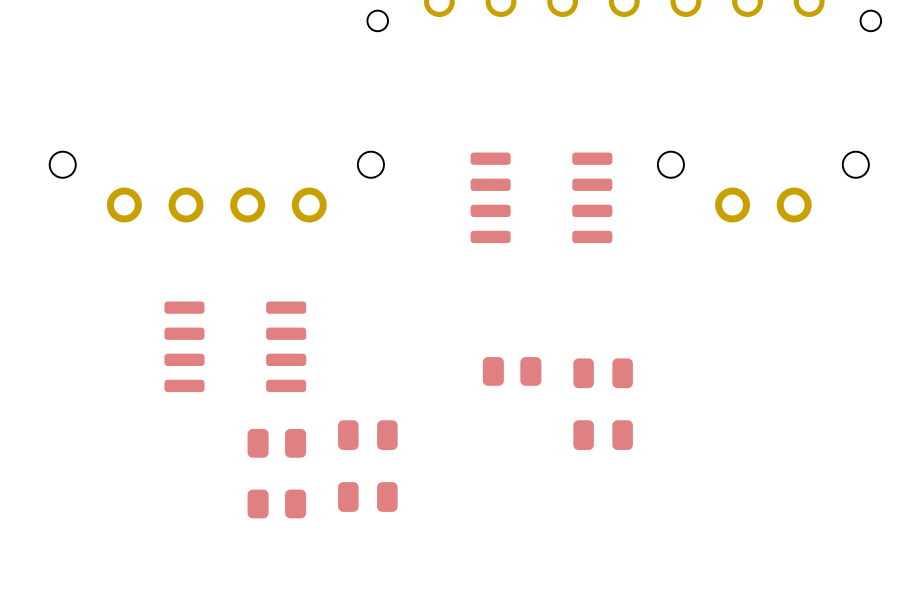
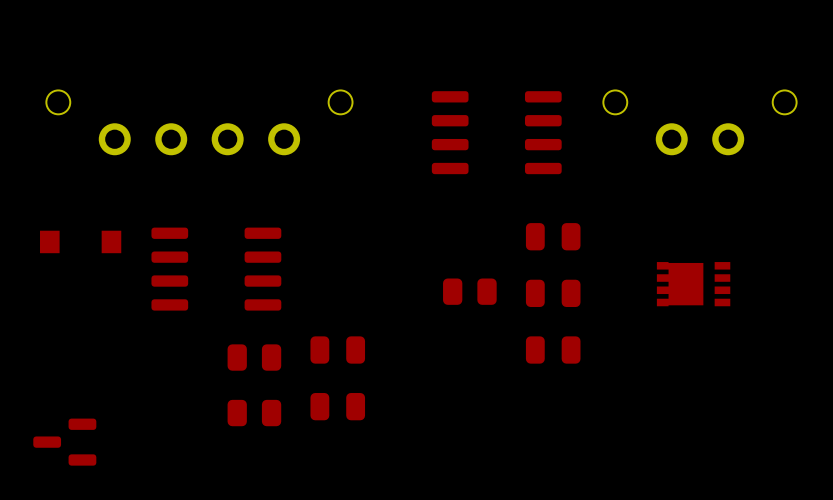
part: none -> (553, 236)
part: none -> (80, 241)
part: none -> (693, 284)
part: none -> (64, 442)

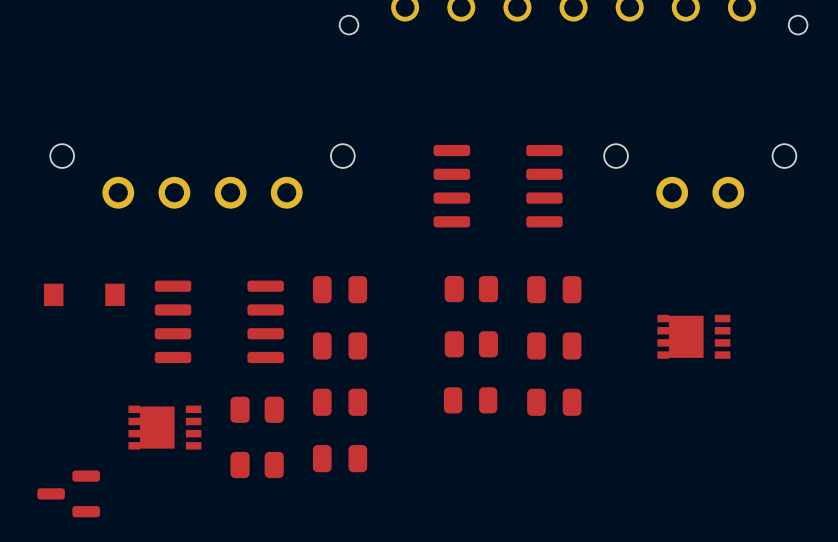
part: none -> (340, 289)
part: none -> (471, 289)
part: none -> (340, 345)
part: none -> (470, 400)
part: none -> (164, 427)

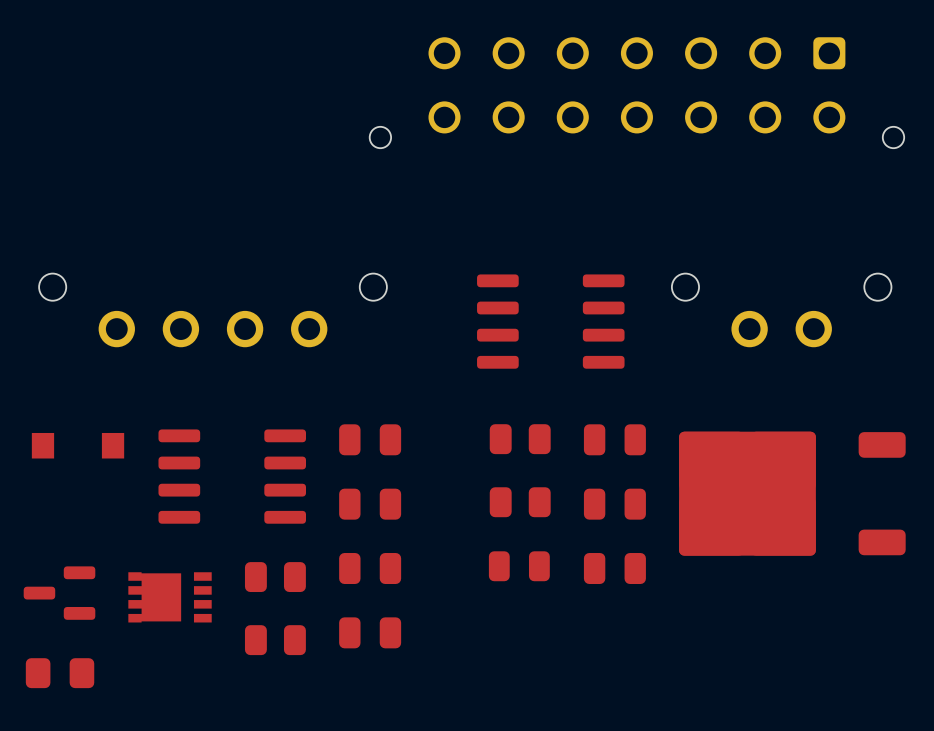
part footprint: [657, 314, 731, 359] -> [679, 431, 906, 556]
part: none -> (59, 593)
part footprint: [37, 470, 100, 518] -> [25, 658, 95, 689]

